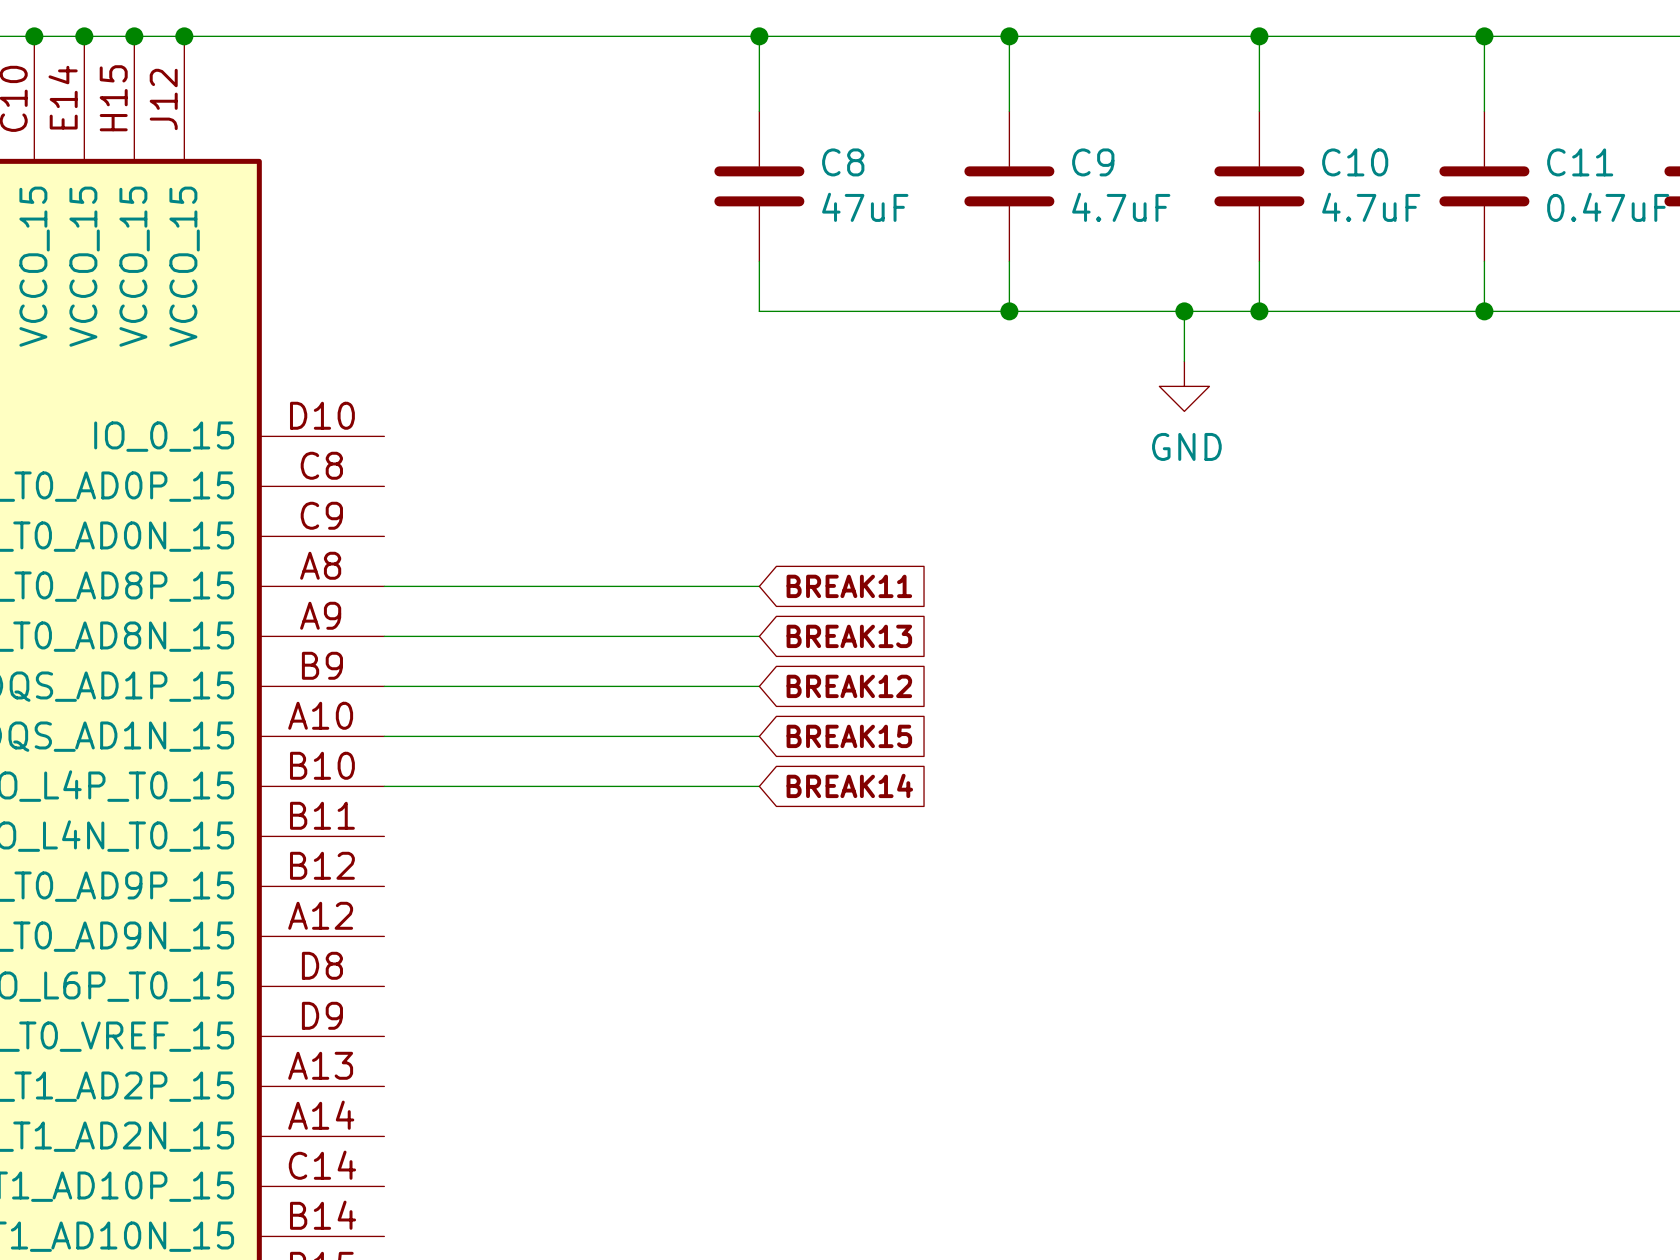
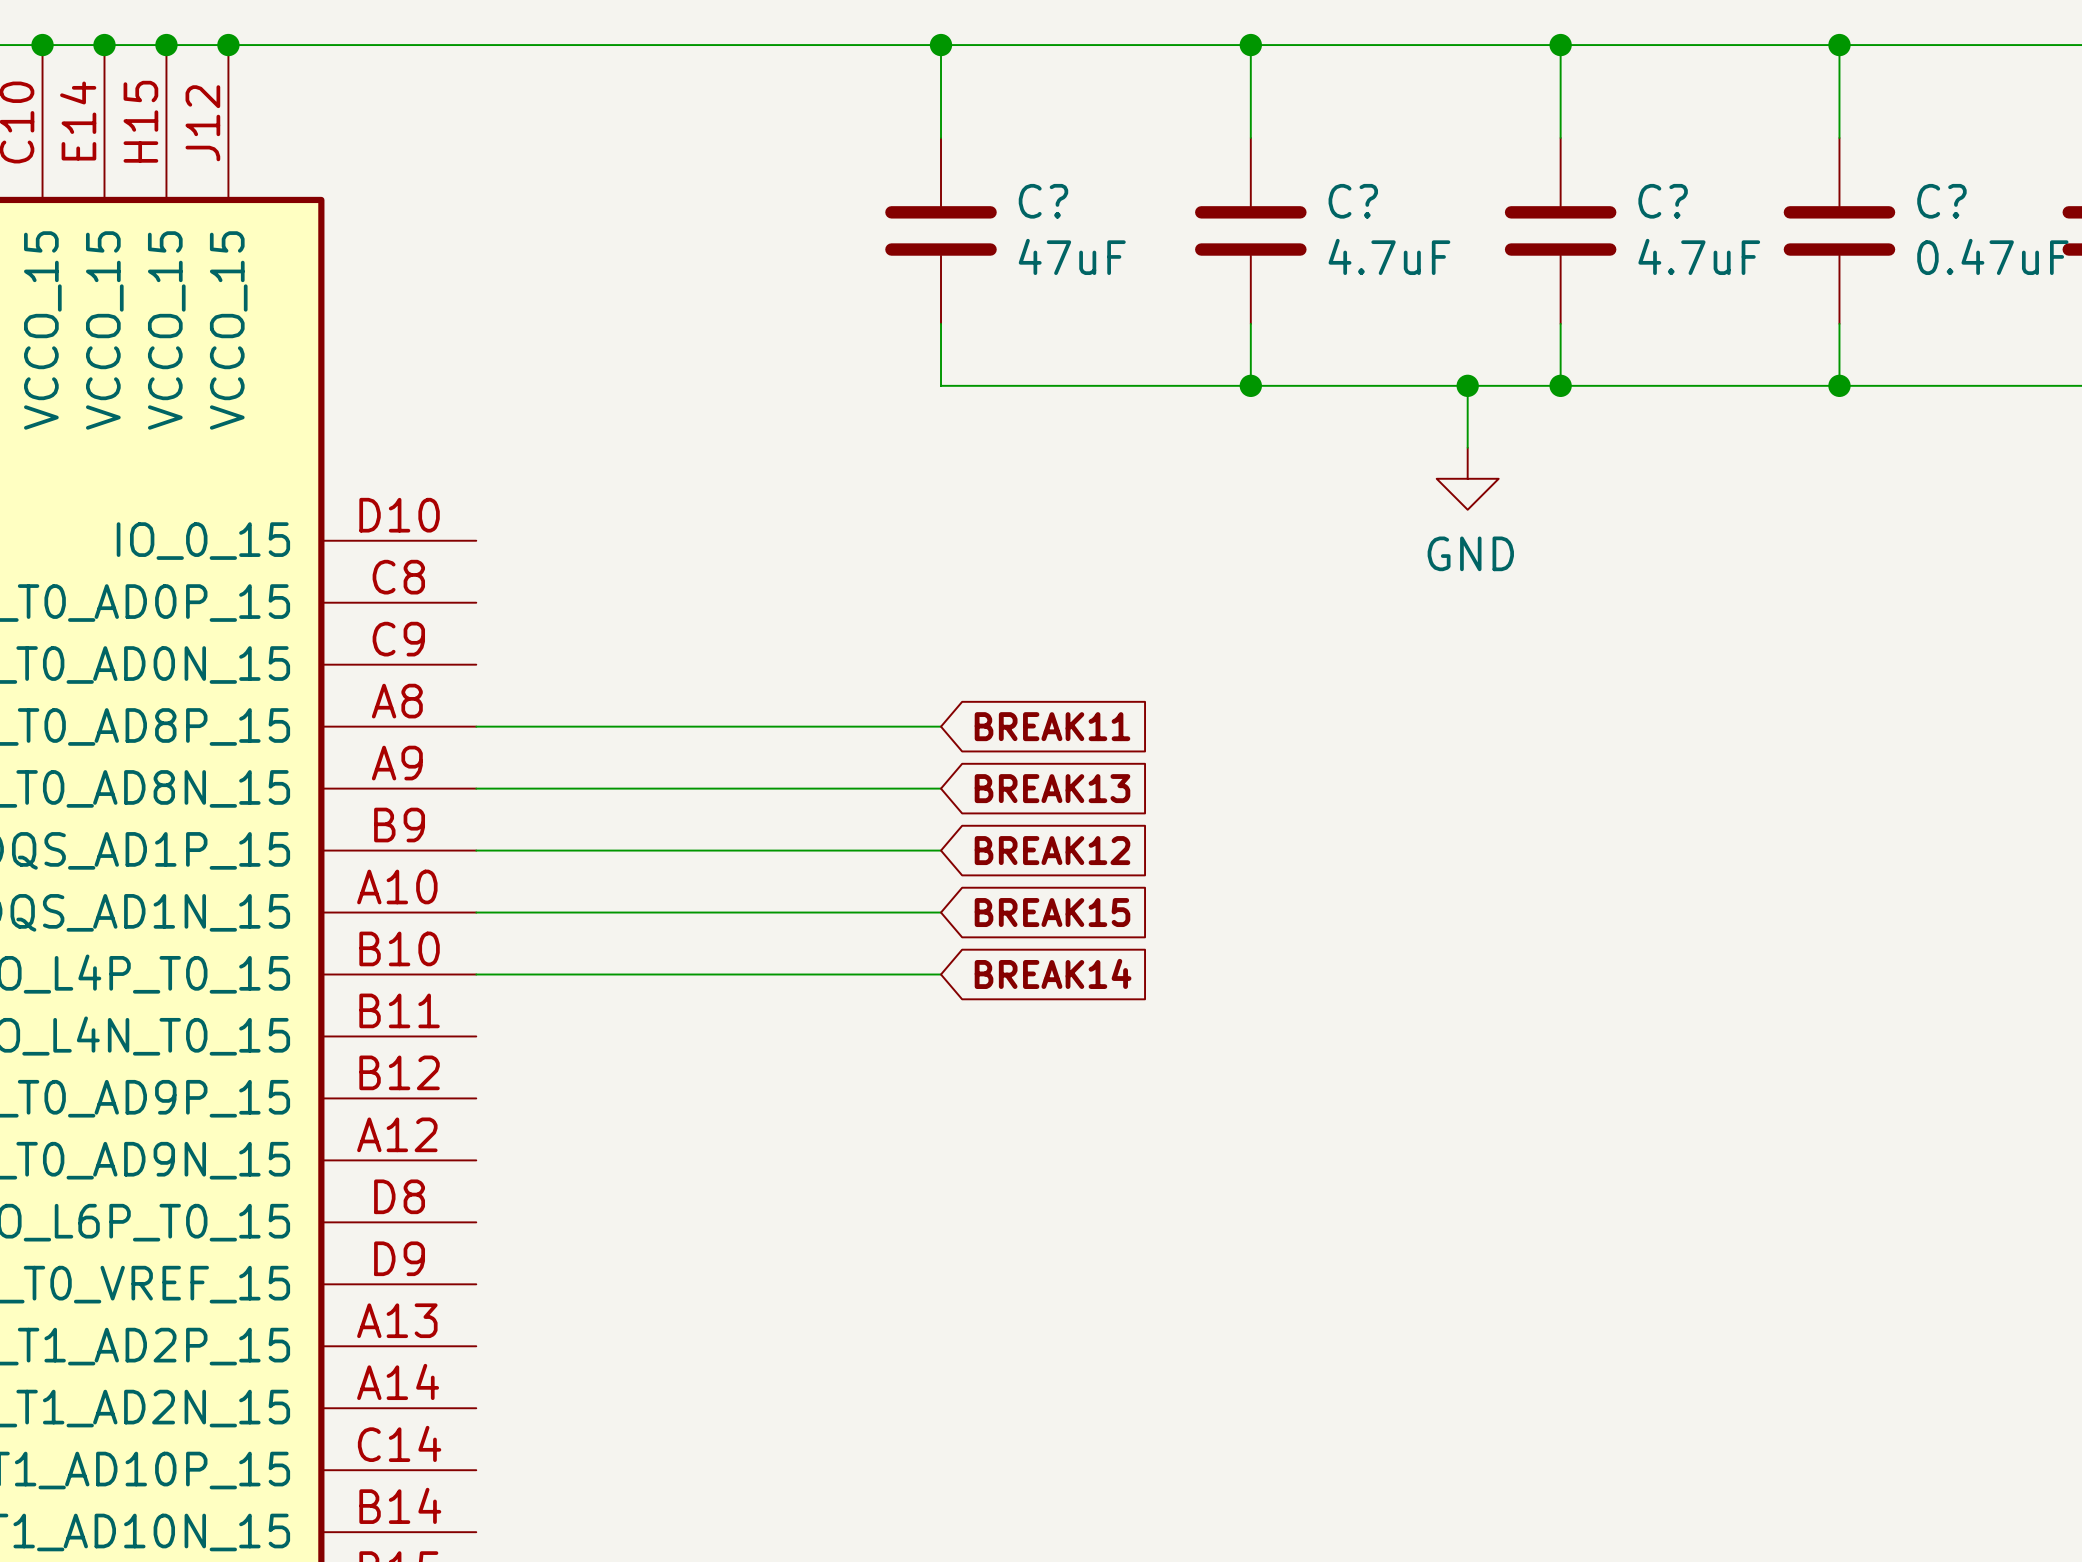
C8 name: C8 (843, 162) -> C? (1043, 201)
C9 name: C9 (1093, 162) -> C? (1353, 201)
C10 name: C10 (1355, 162) -> C? (1663, 201)
C11 name: C11 (1580, 162) -> C? (1941, 201)

